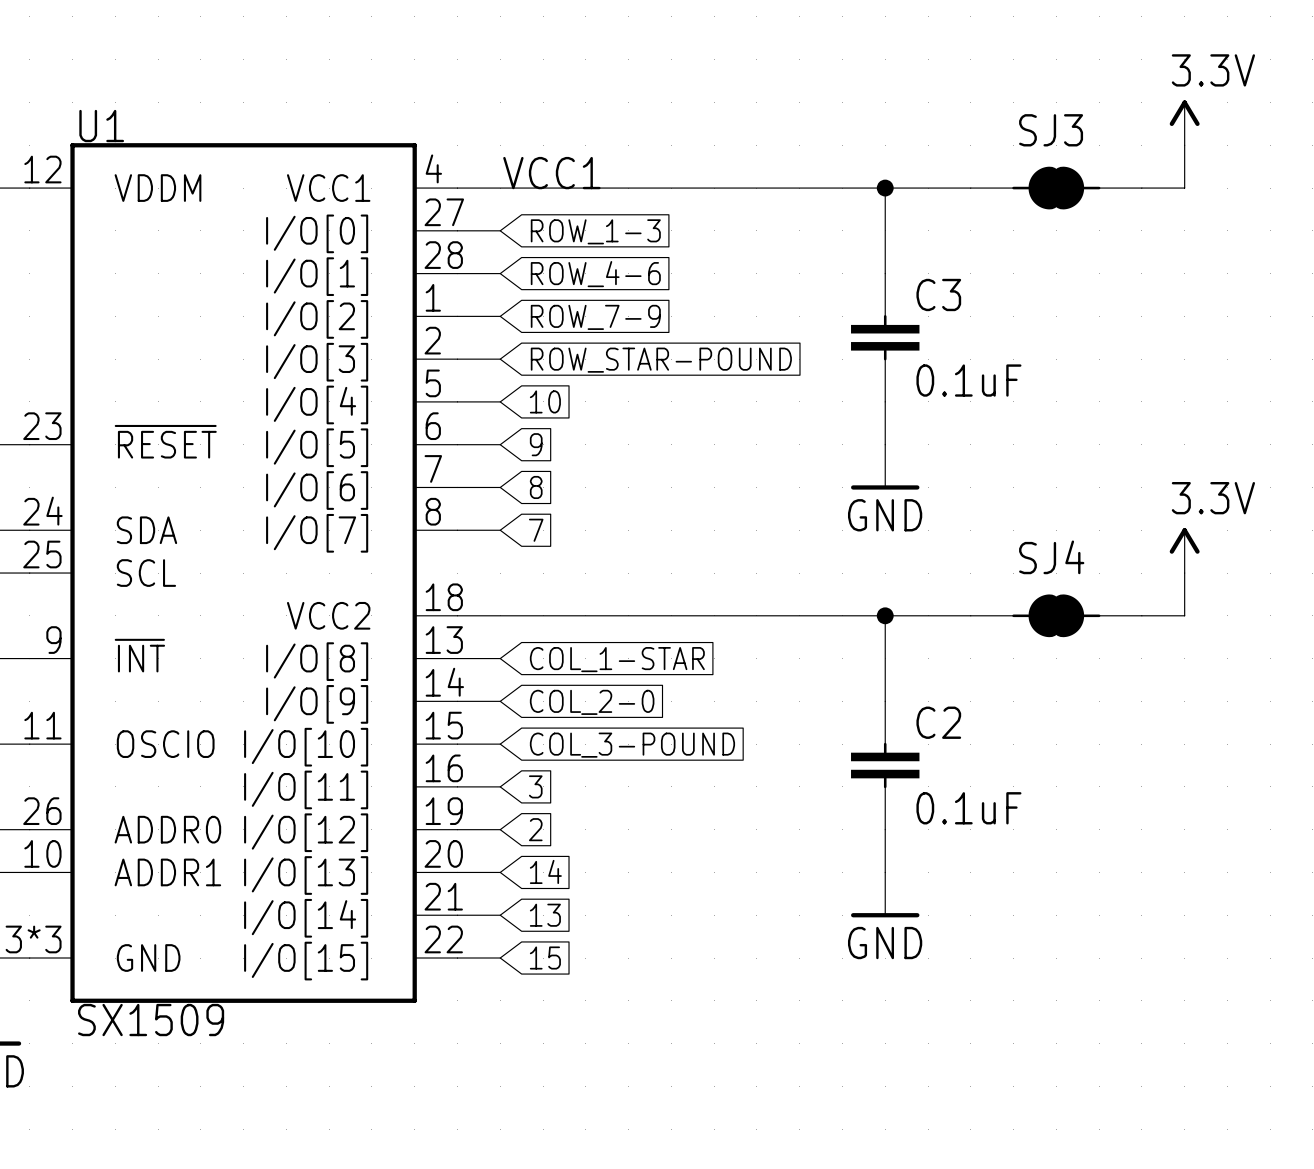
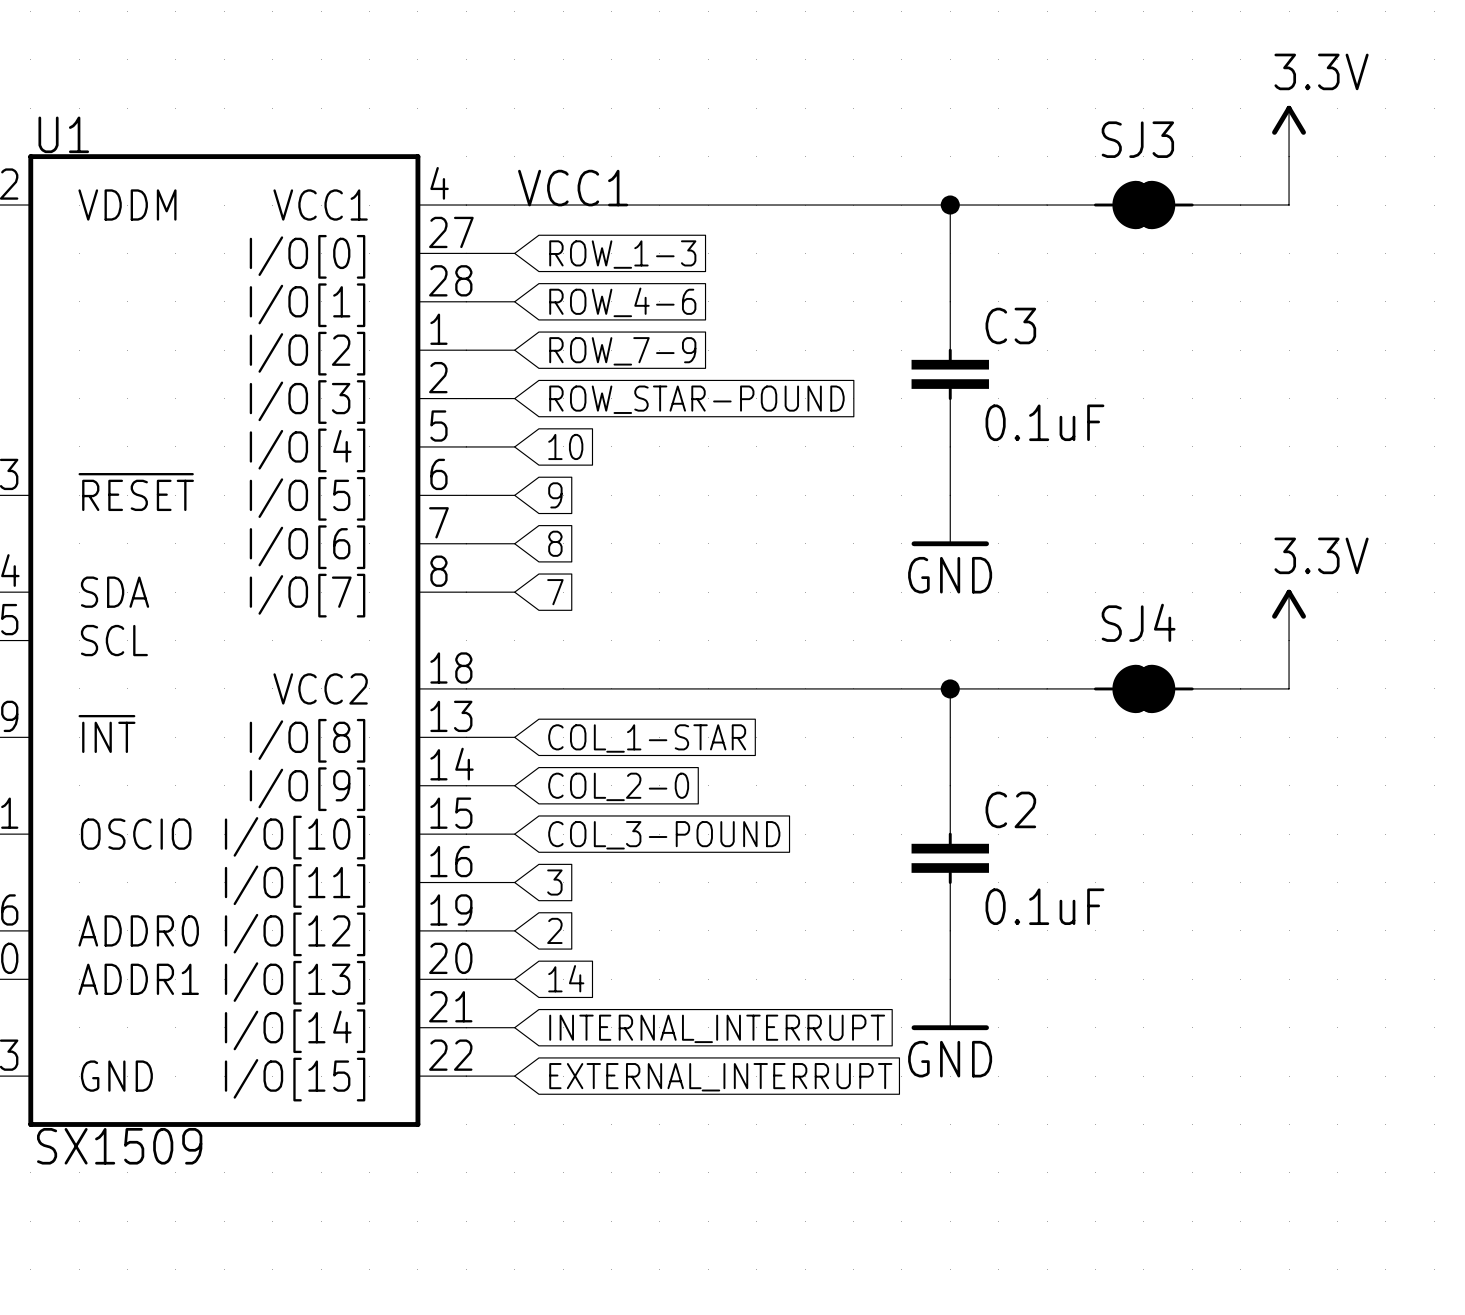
global label: 13 (545, 915) -> INTERNAL_INTERRUPT (717, 1028)
global label: 15 (545, 958) -> EXTERNAL_INTERRUPT (720, 1077)

